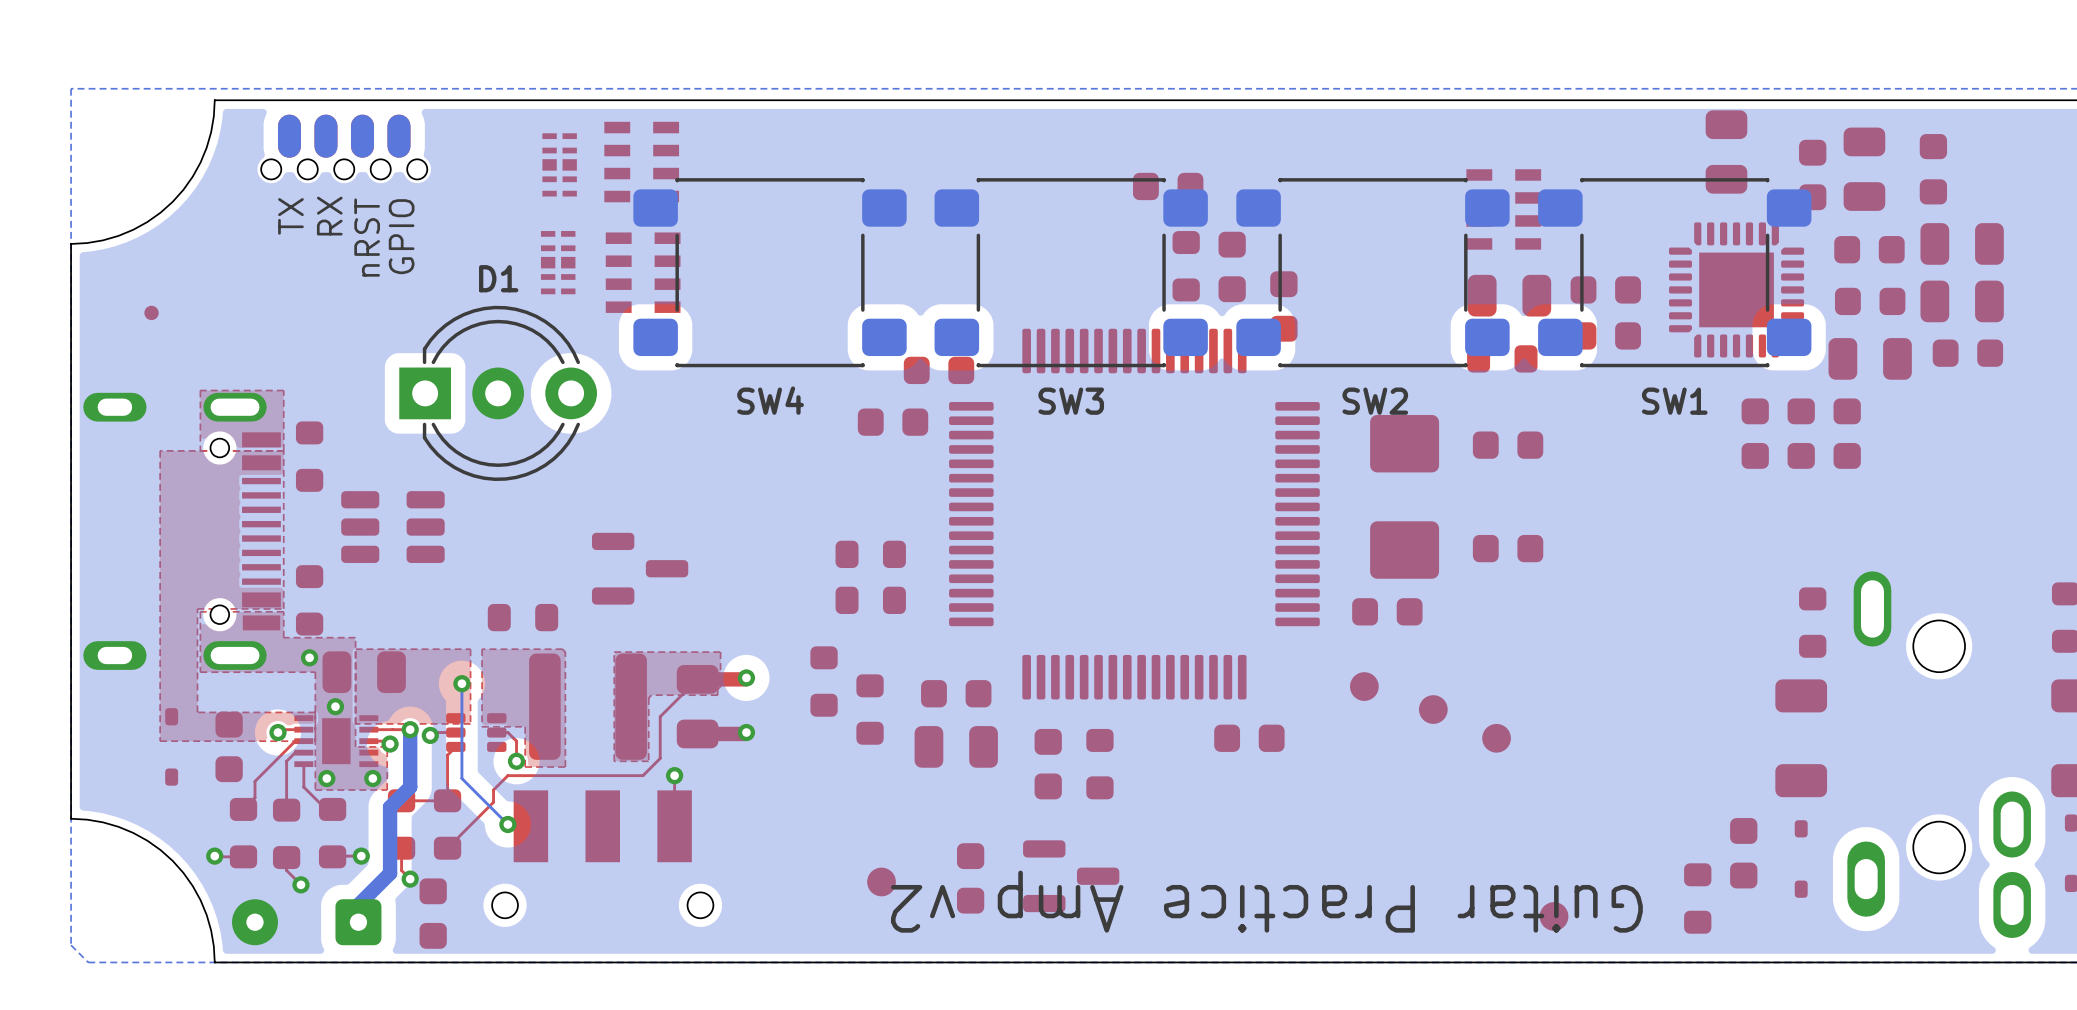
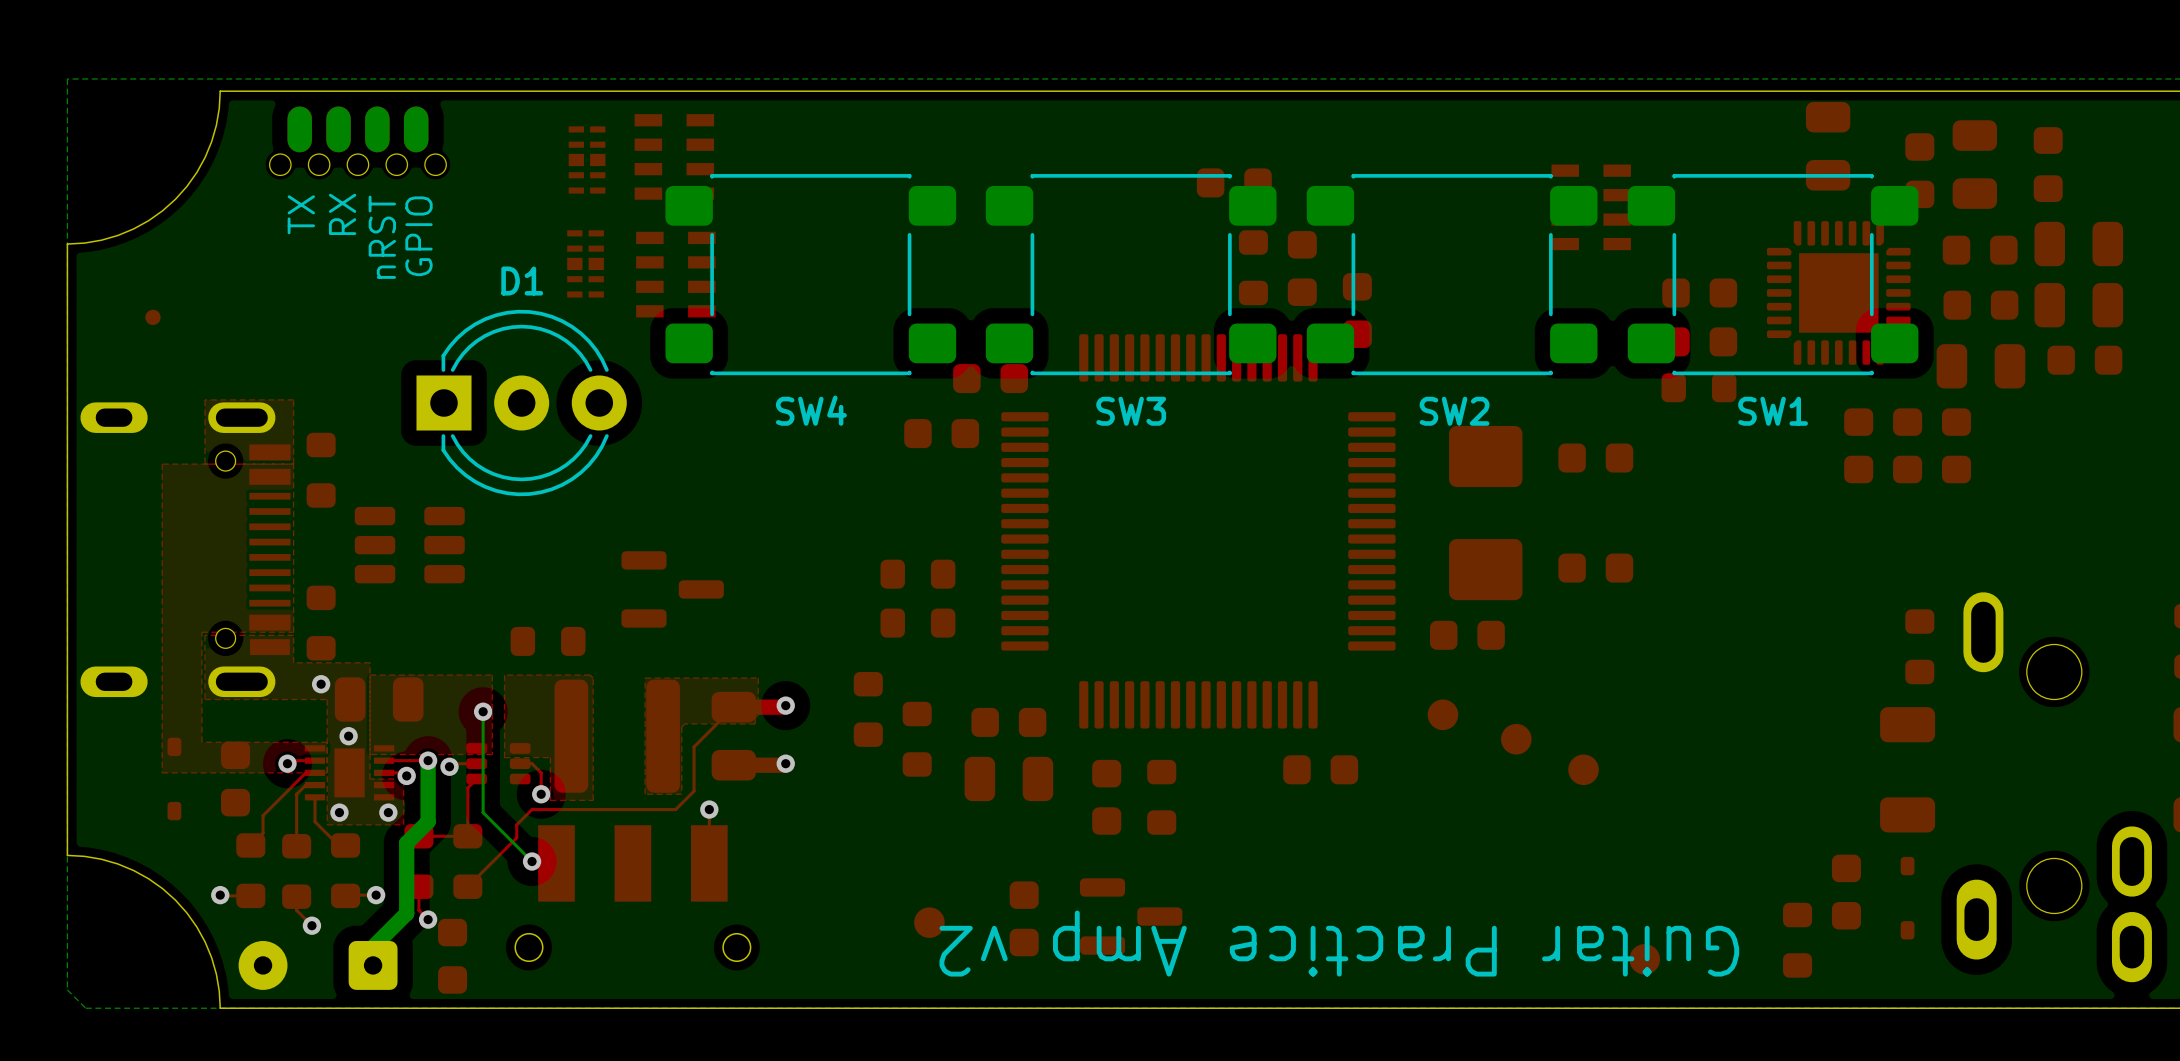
part: (1509, 295) -> none
part position: (1502, 358) -> (1698, 387)

